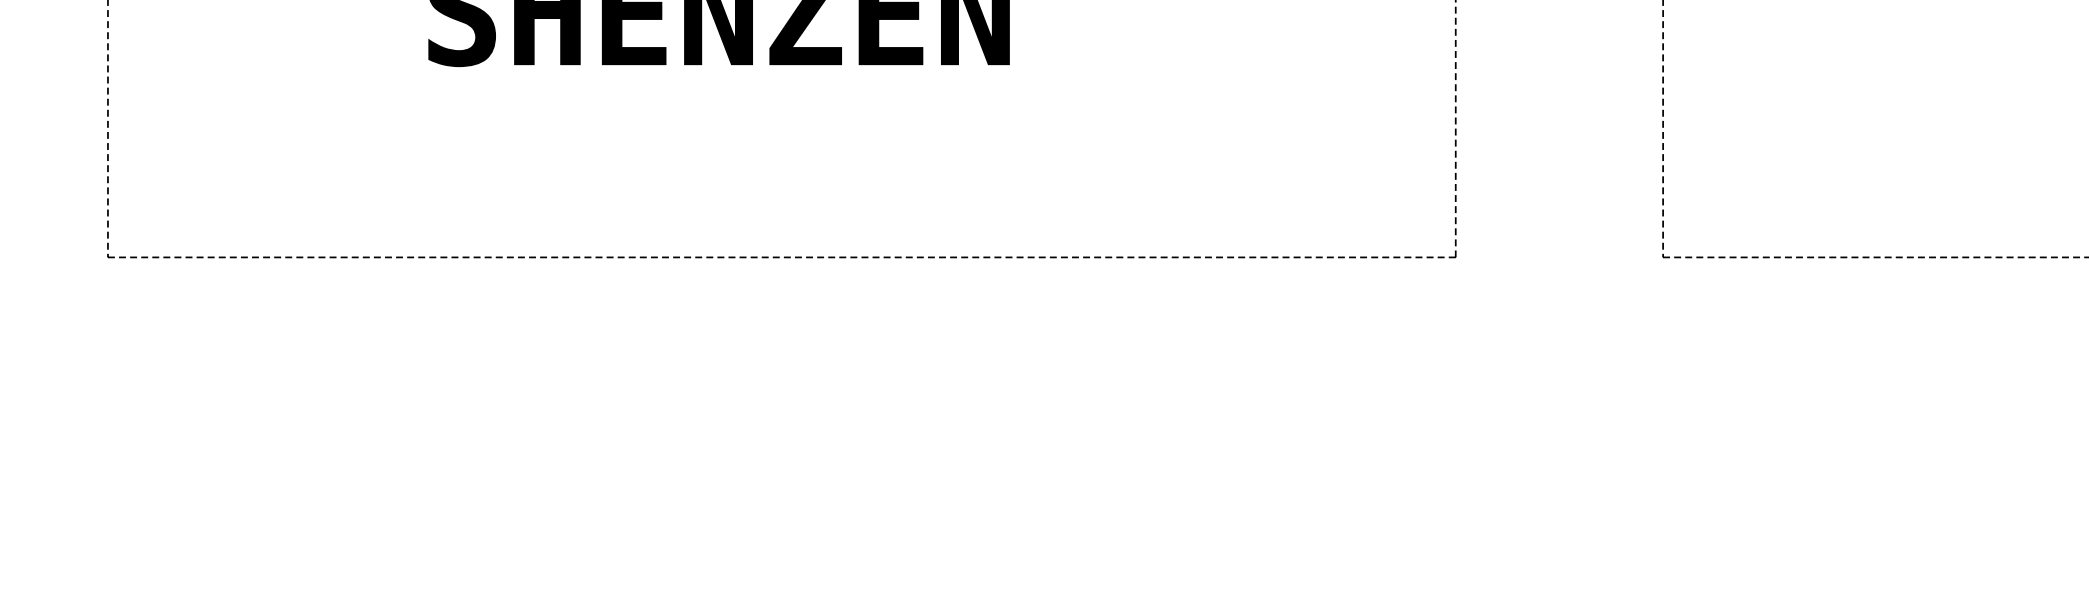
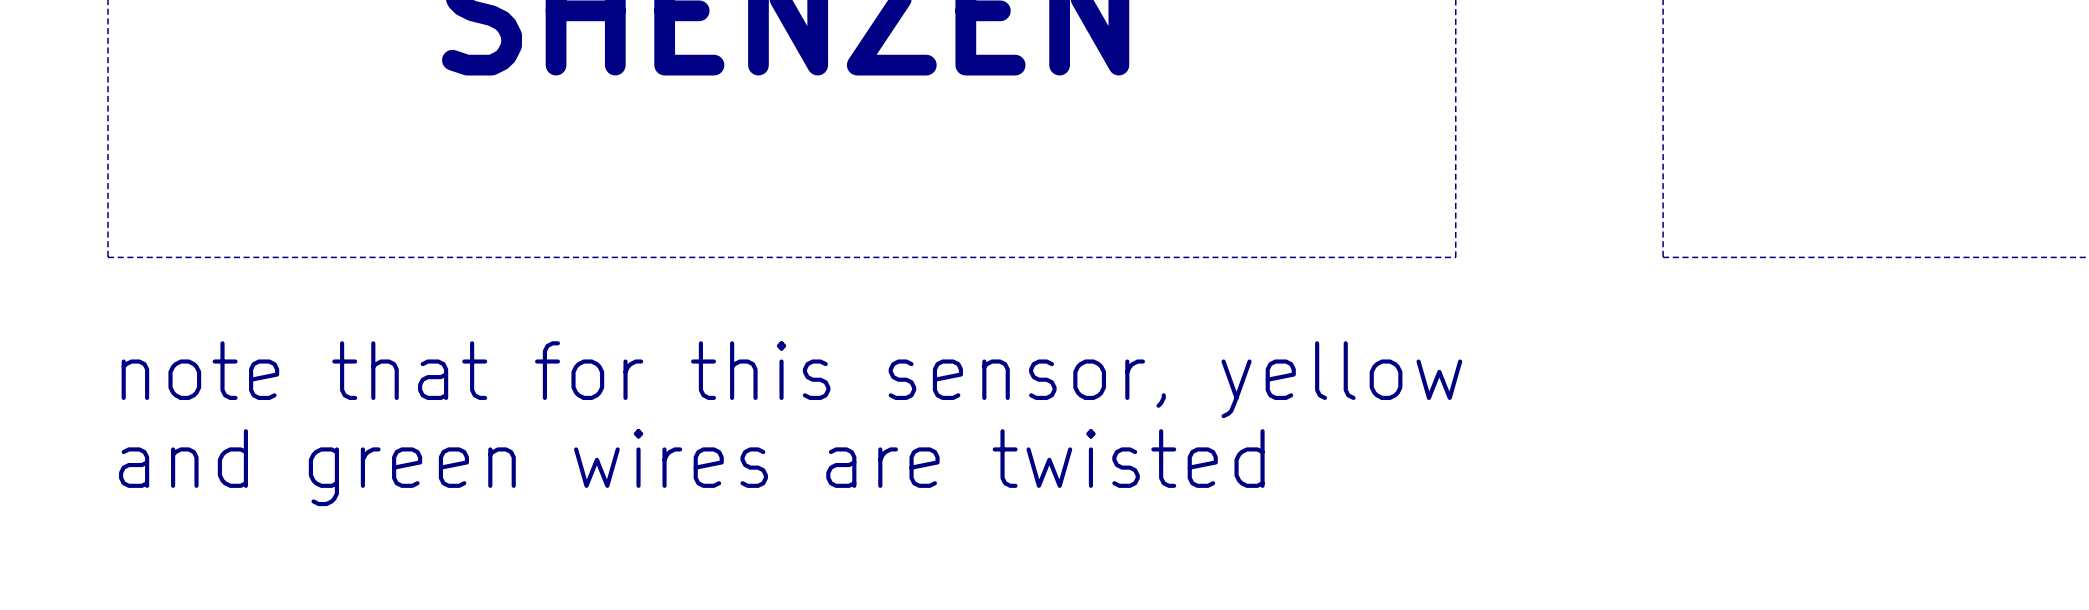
text: none -> note that for this sensor, yellow (791, 379)
text: none -> and green wires are twisted (691, 467)

